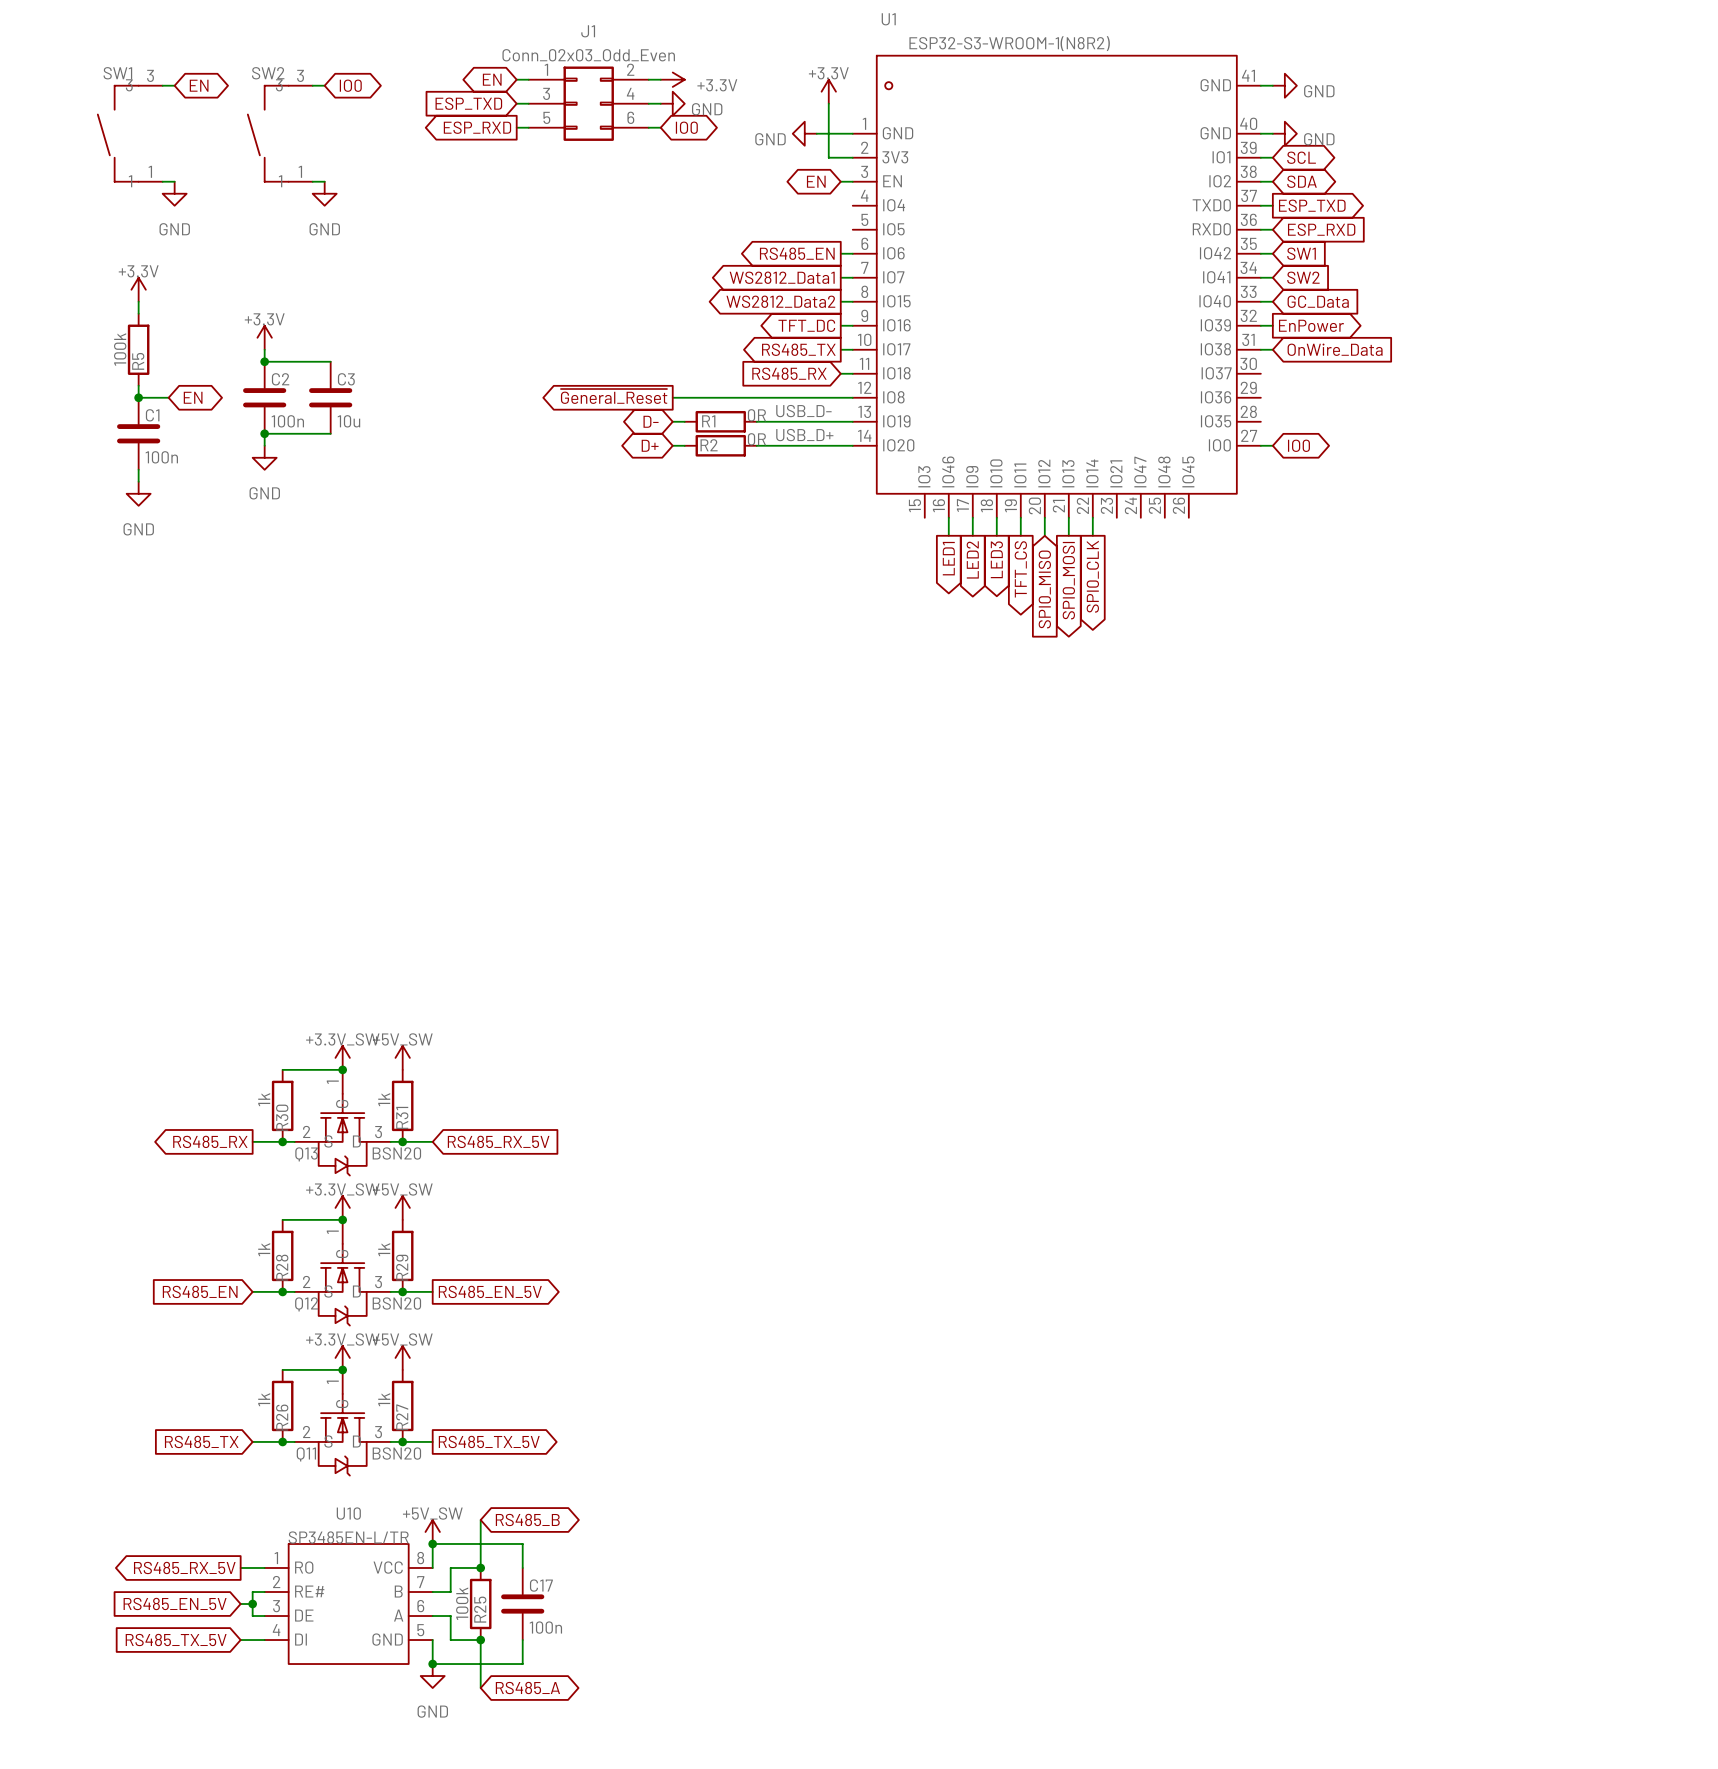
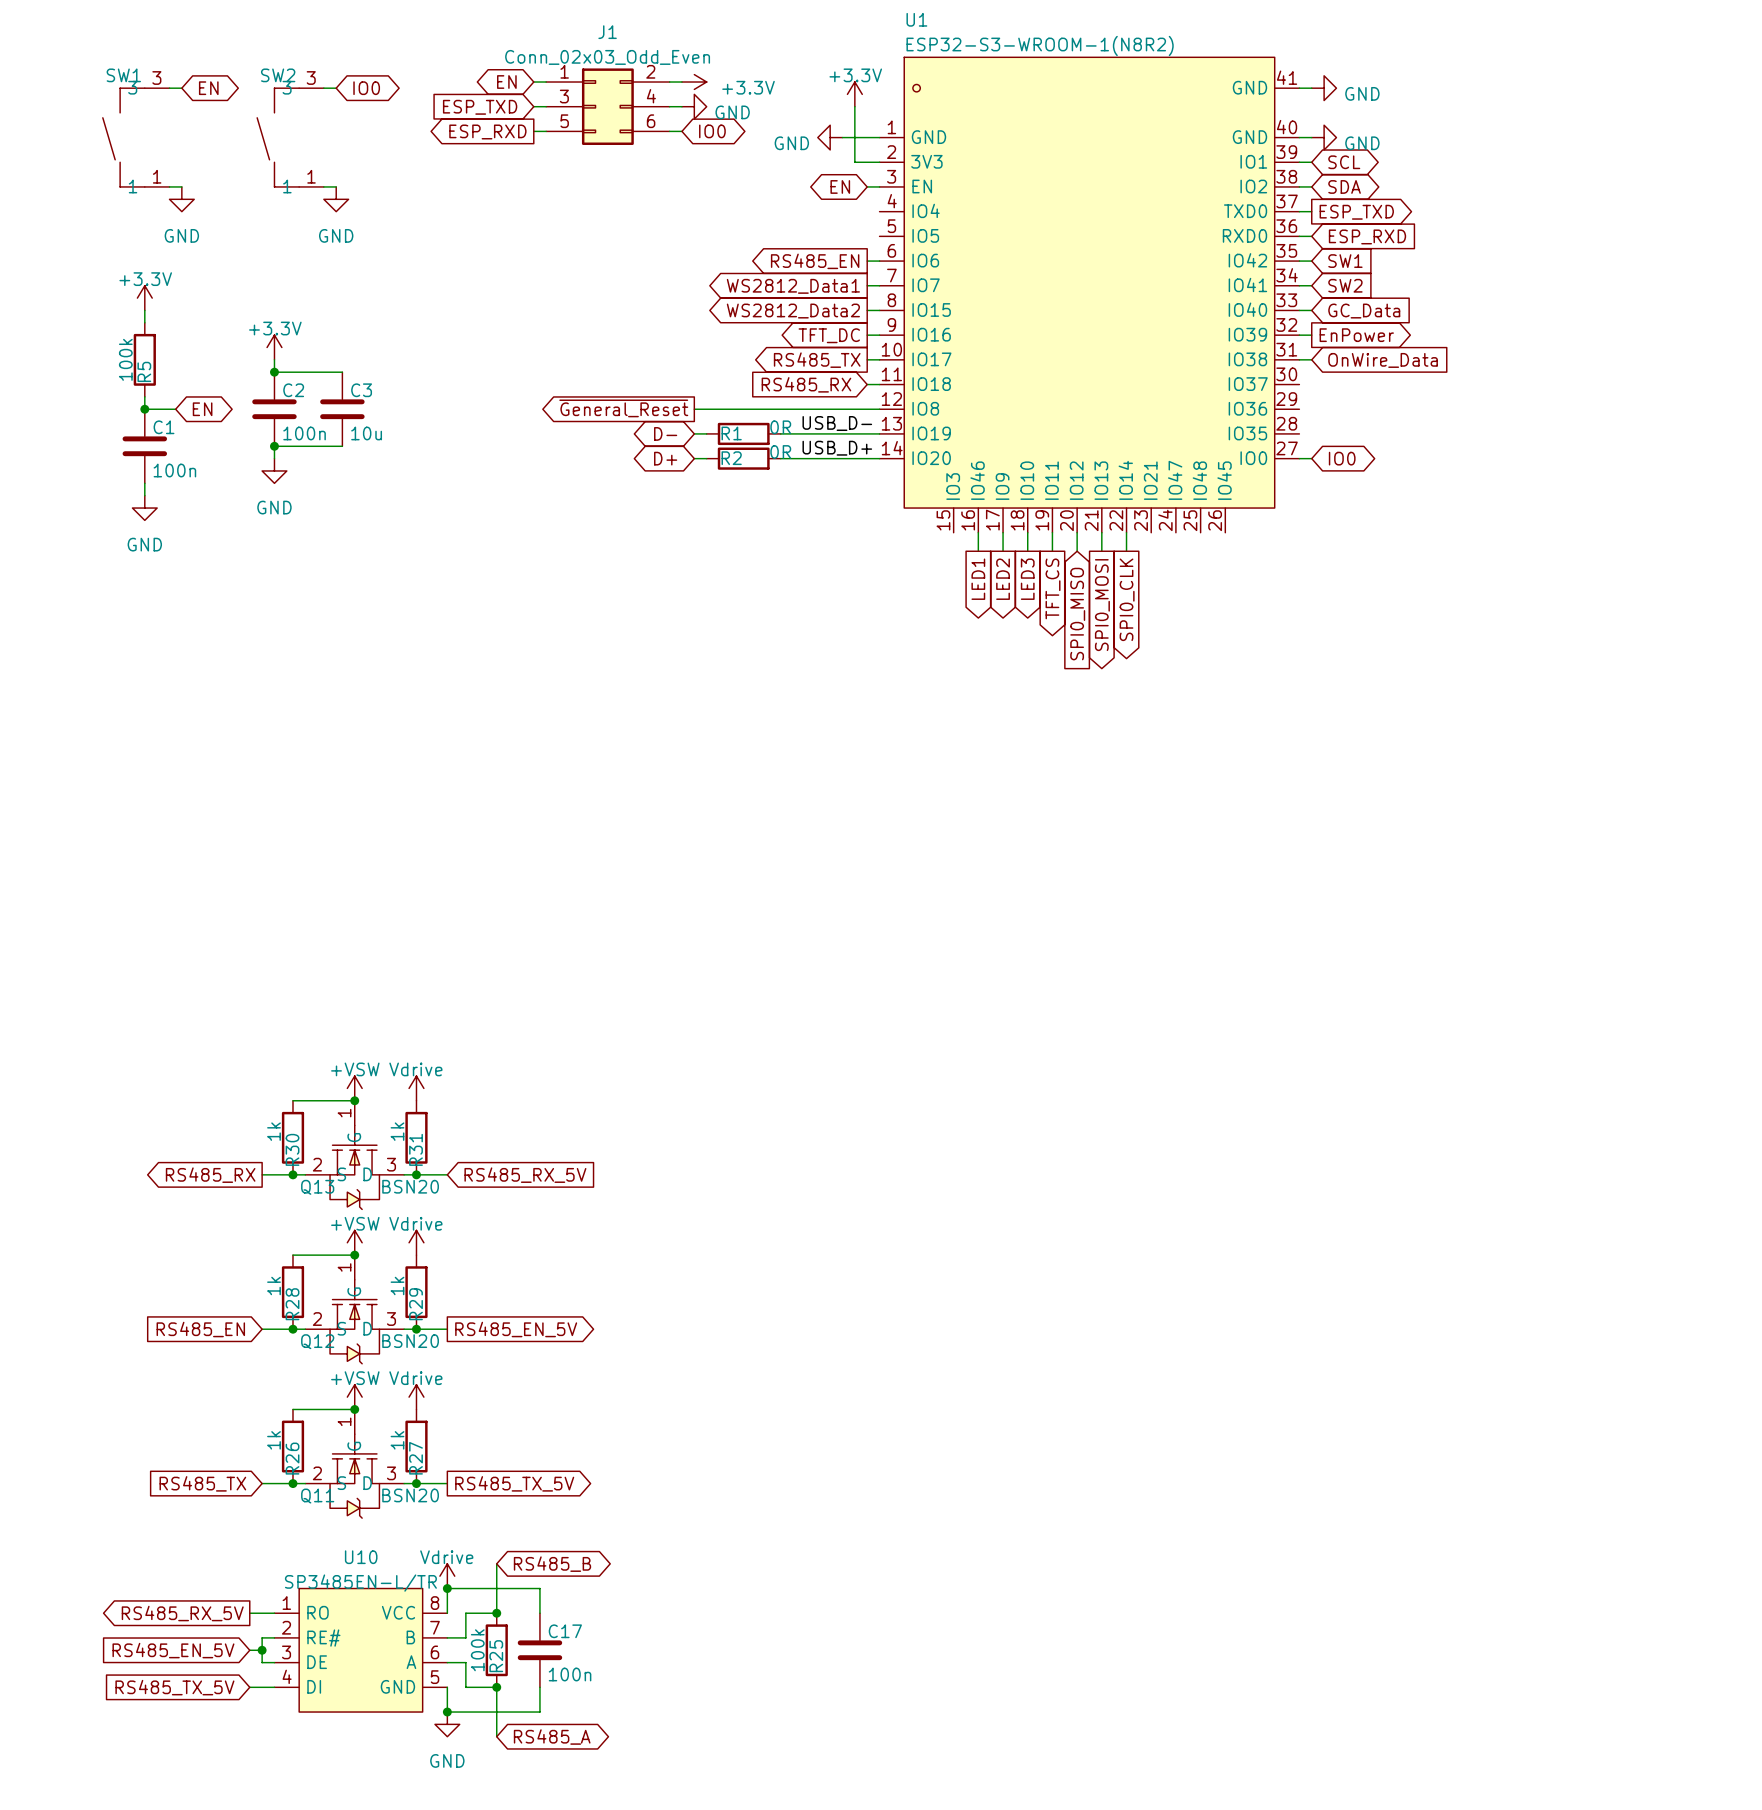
power symbol: +3.3V_SW (342, 1057) -> +VSW (354, 1088)
power symbol: +5V_SW (402, 1057) -> Vdrive (416, 1088)
power symbol: +3.3V_SW (342, 1207) -> +VSW (354, 1242)
power symbol: +5V_SW (402, 1207) -> Vdrive (416, 1242)
power symbol: +3.3V_SW (342, 1357) -> +VSW (354, 1397)
power symbol: +5V_SW (402, 1357) -> Vdrive (416, 1397)
power symbol: +5V_SW (432, 1531) -> Vdrive (447, 1576)

